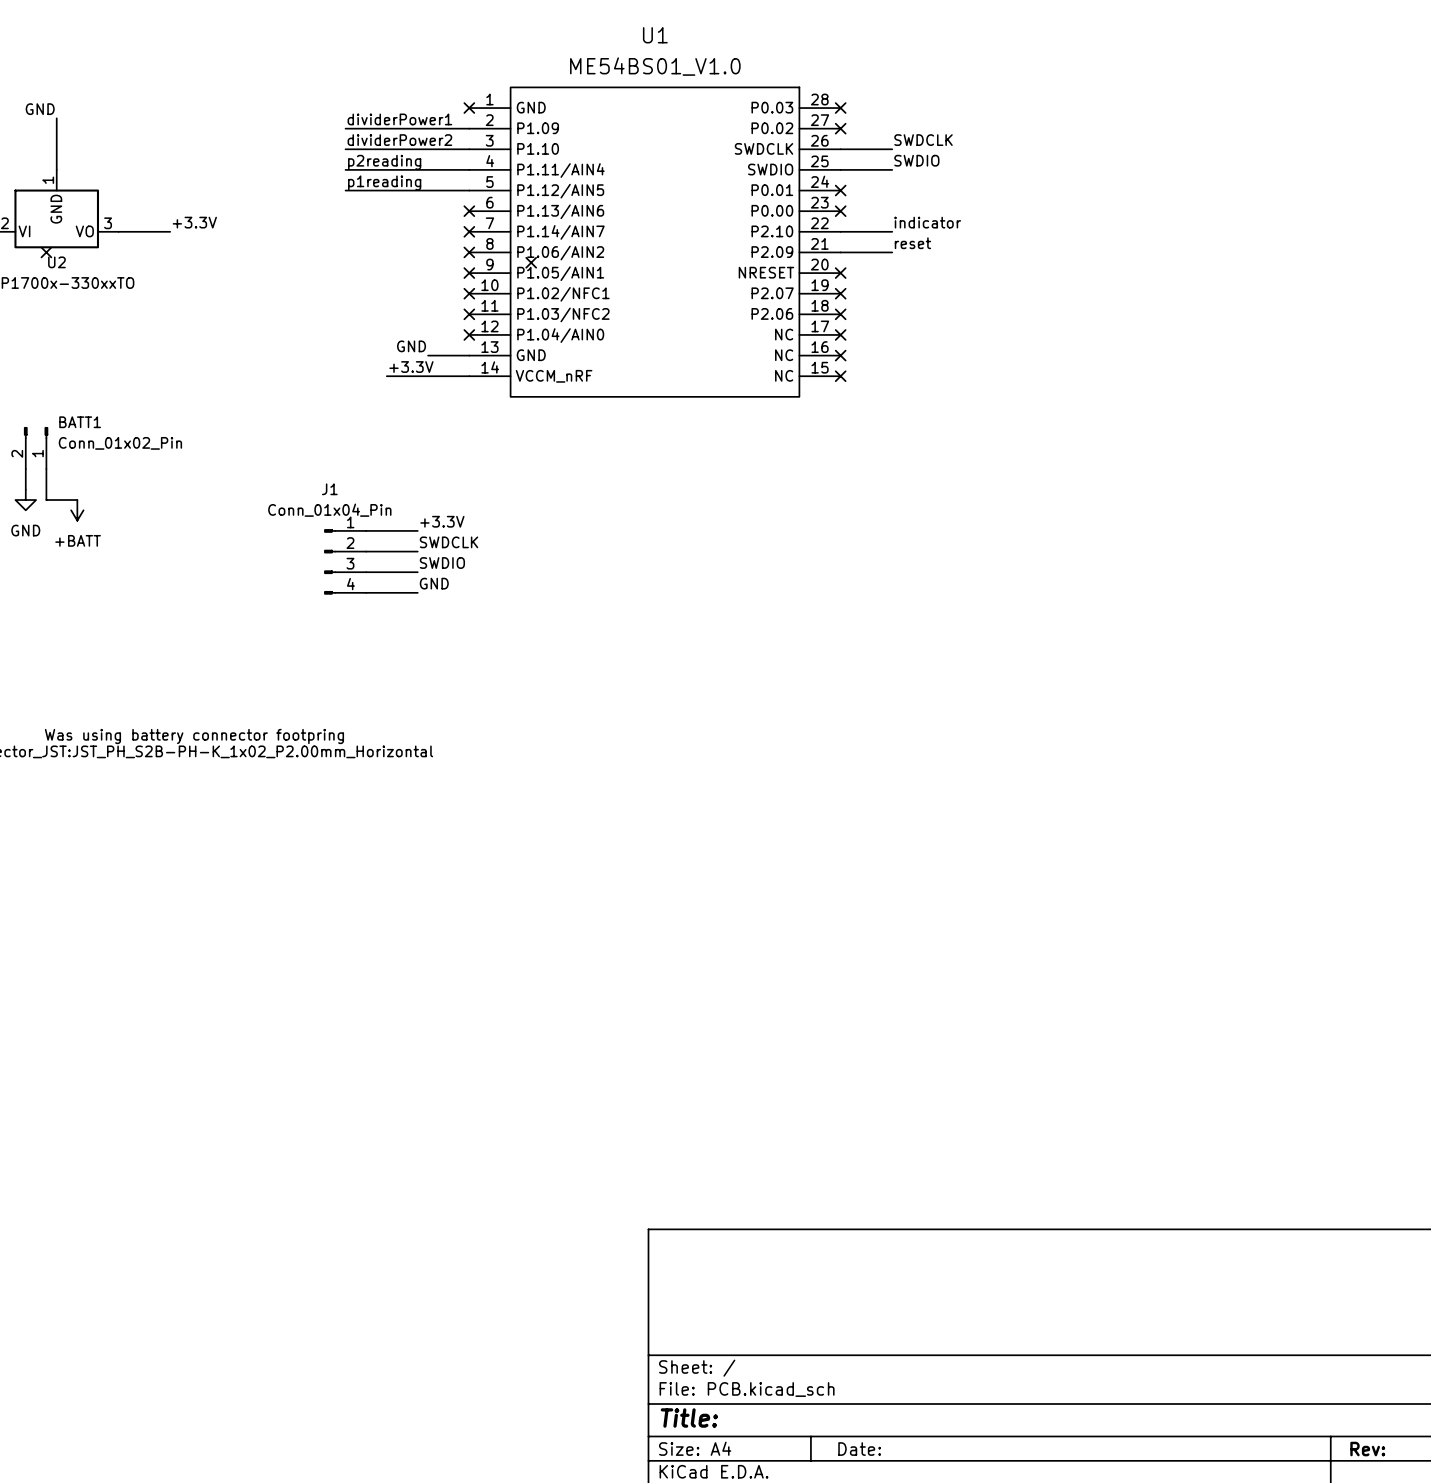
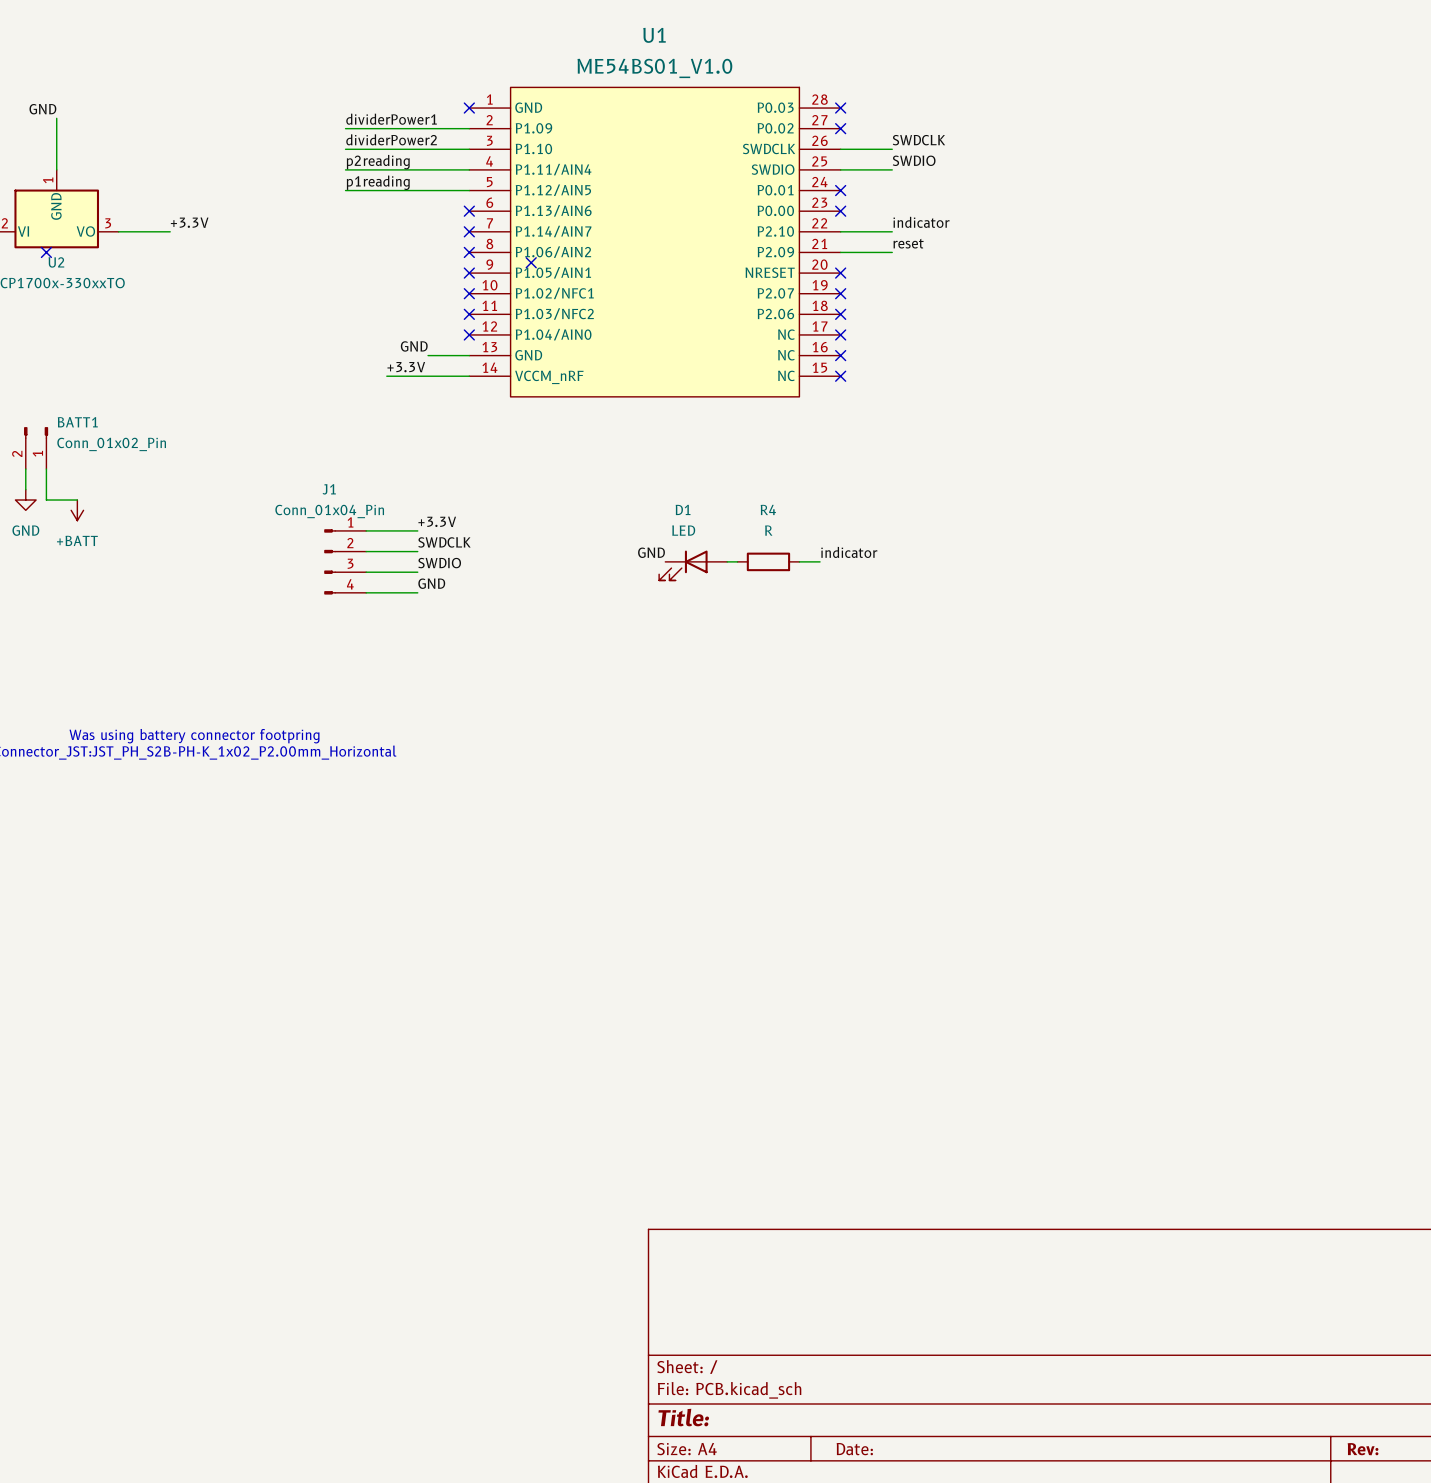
label: none -> GND (651, 552)
label: none -> indicator (849, 552)
wire: none -> (727, 561) (737, 561)
R4: none -> R (768, 561)
wire: none -> (799, 561) (820, 561)
D1: none -> LED (693, 565)

